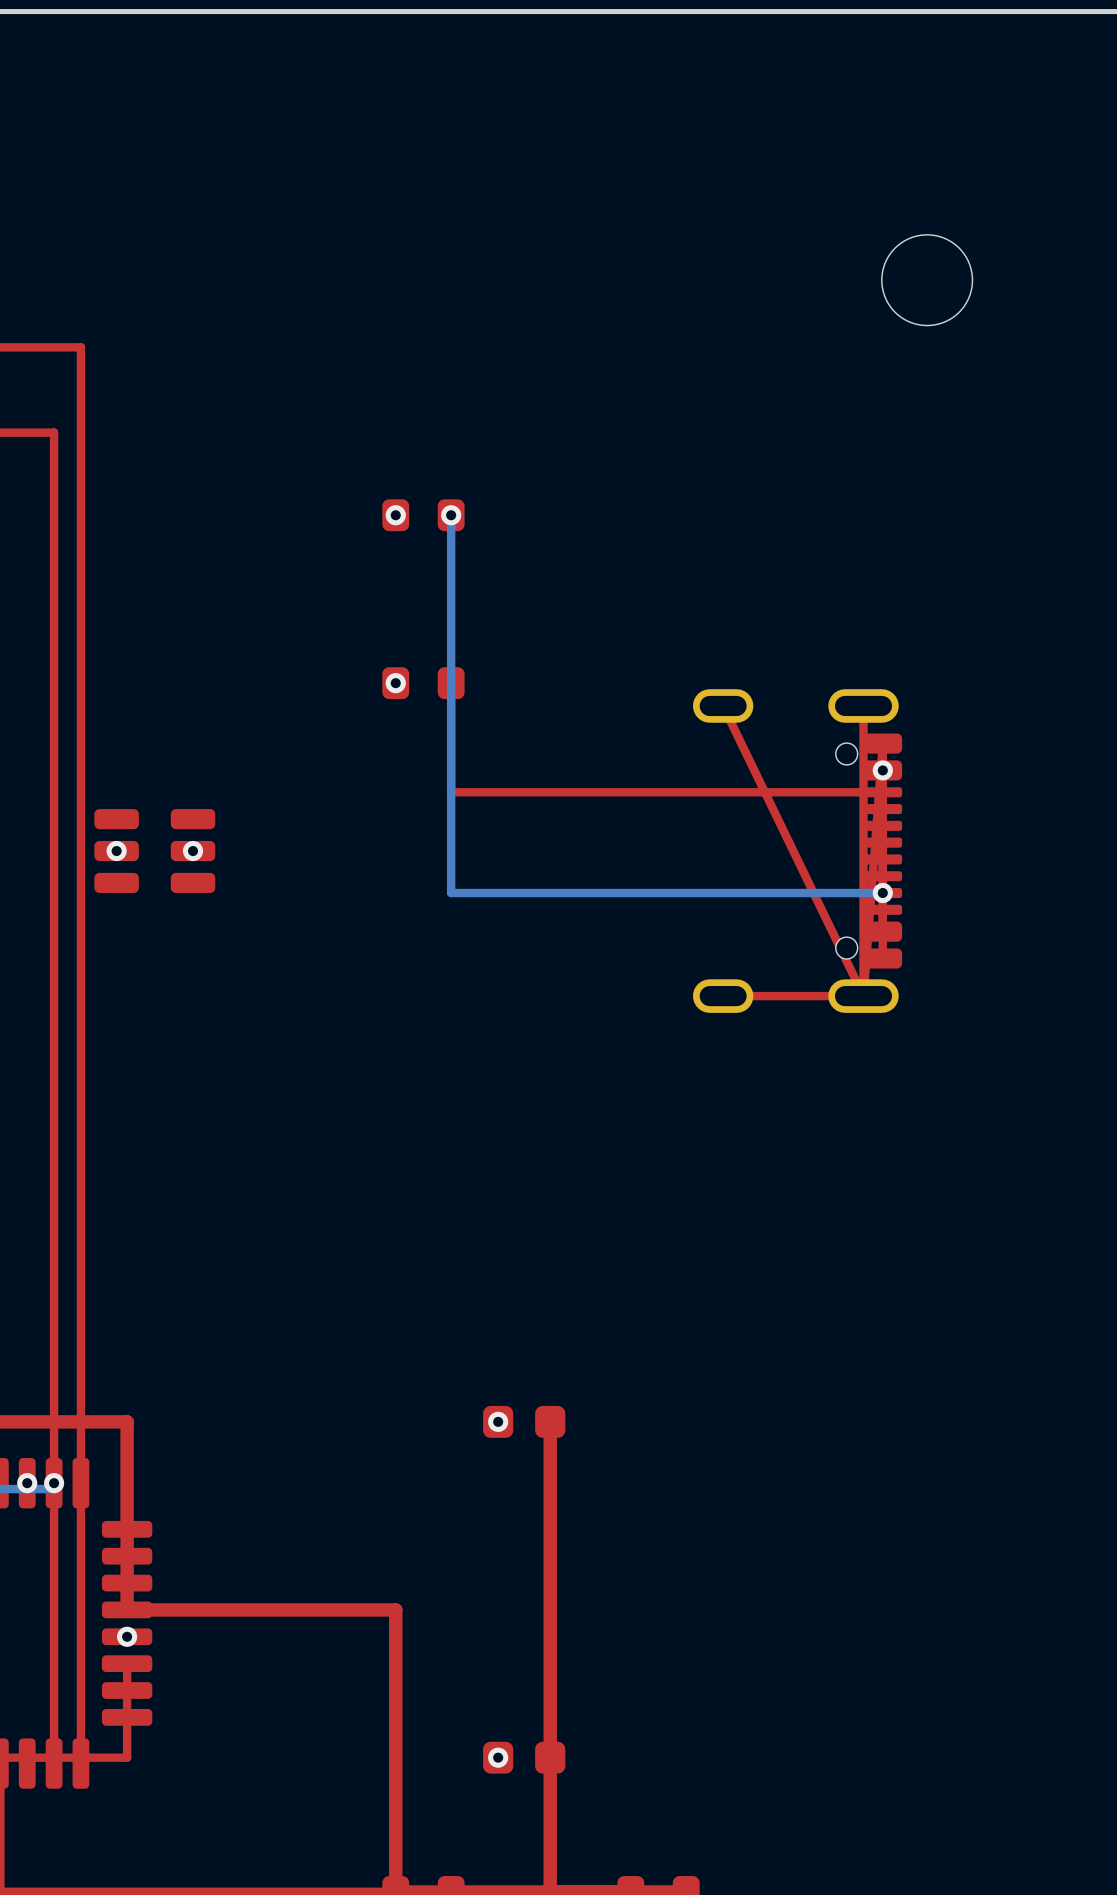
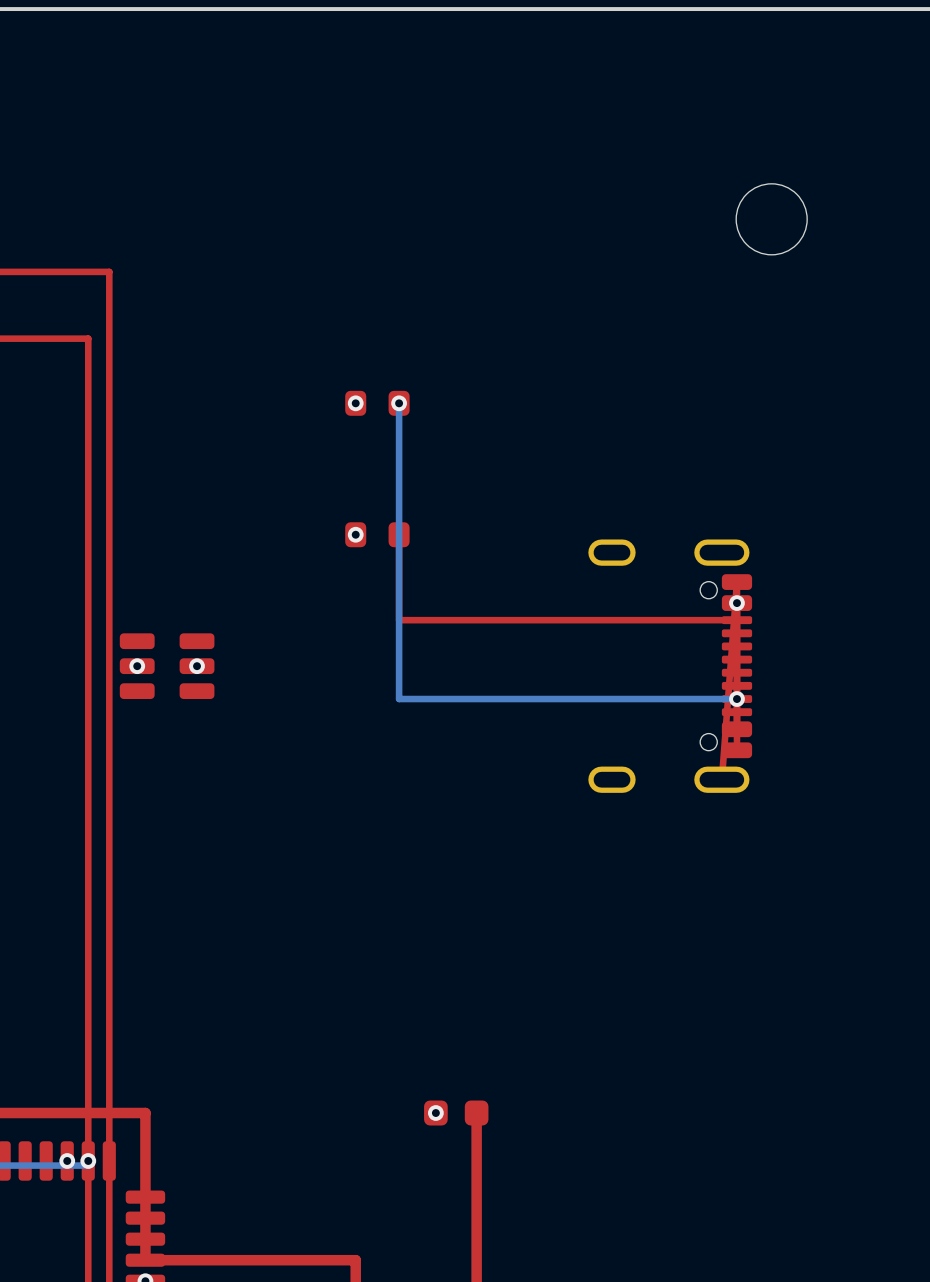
top track: (723, 705) (863, 996) -> none
top track: (863, 705) (863, 996) -> none
top track: (863, 996) (723, 996) -> none

